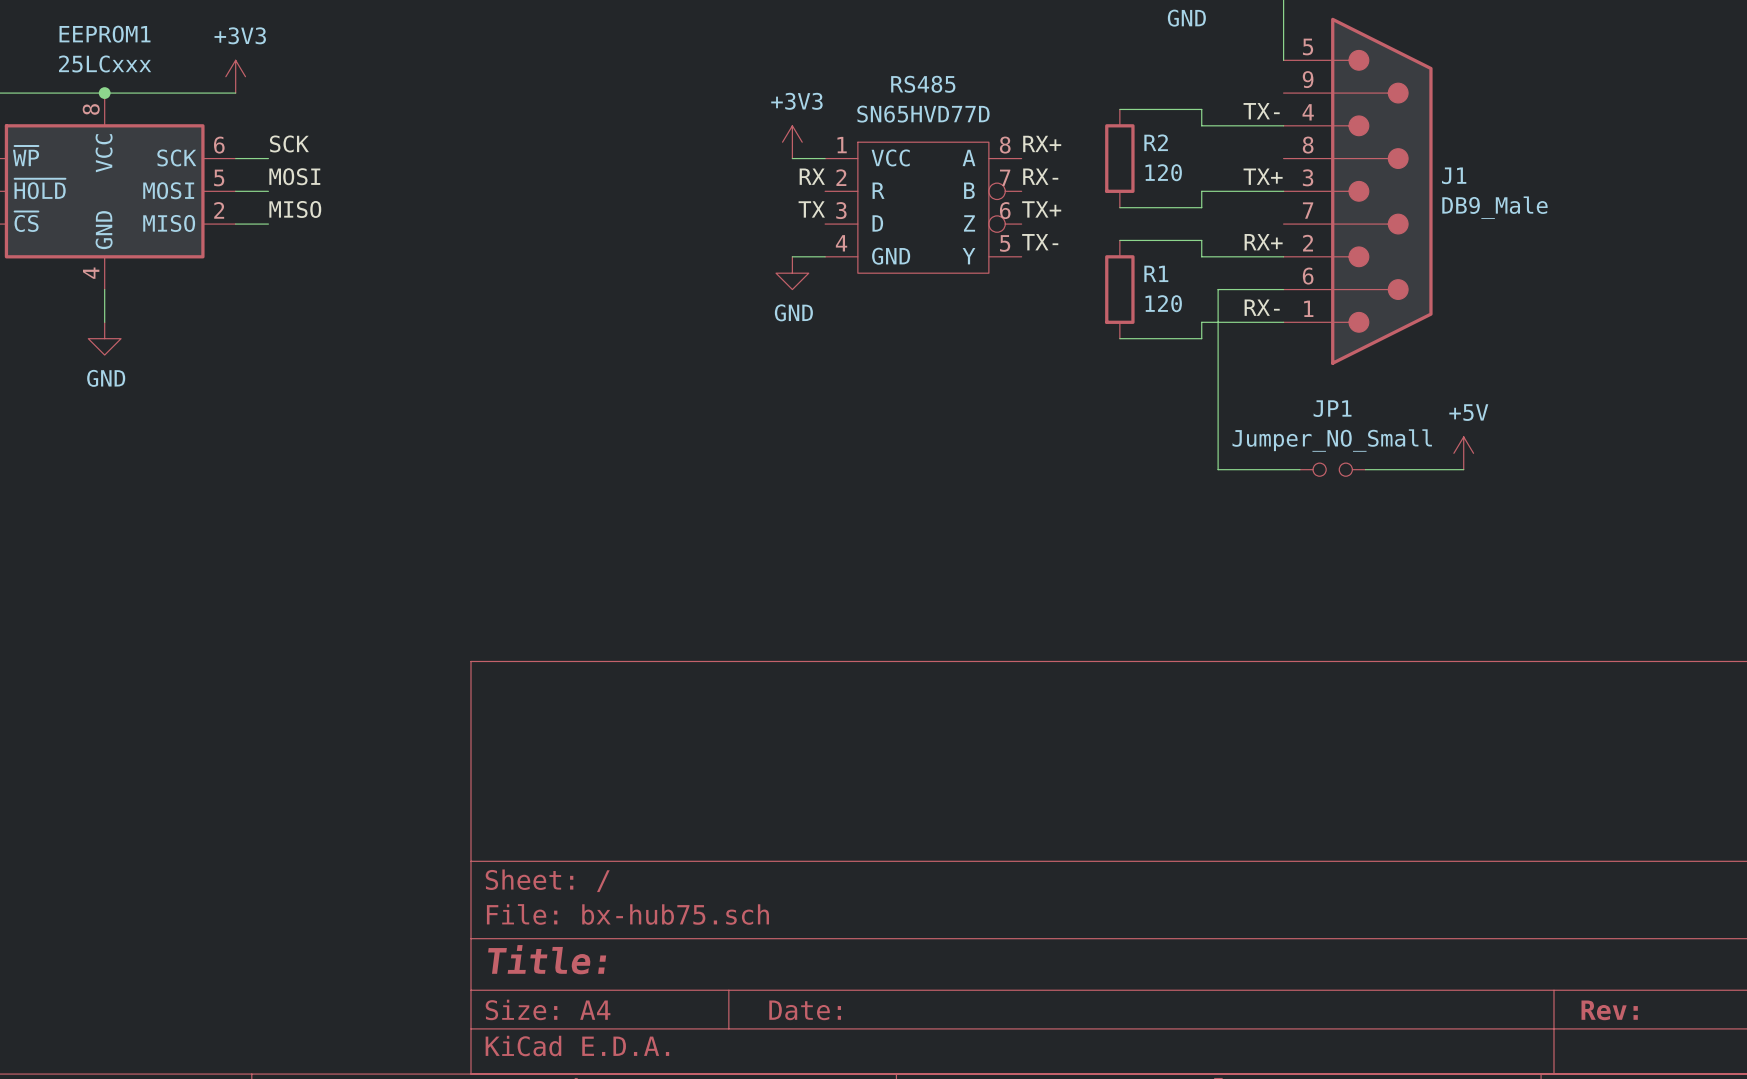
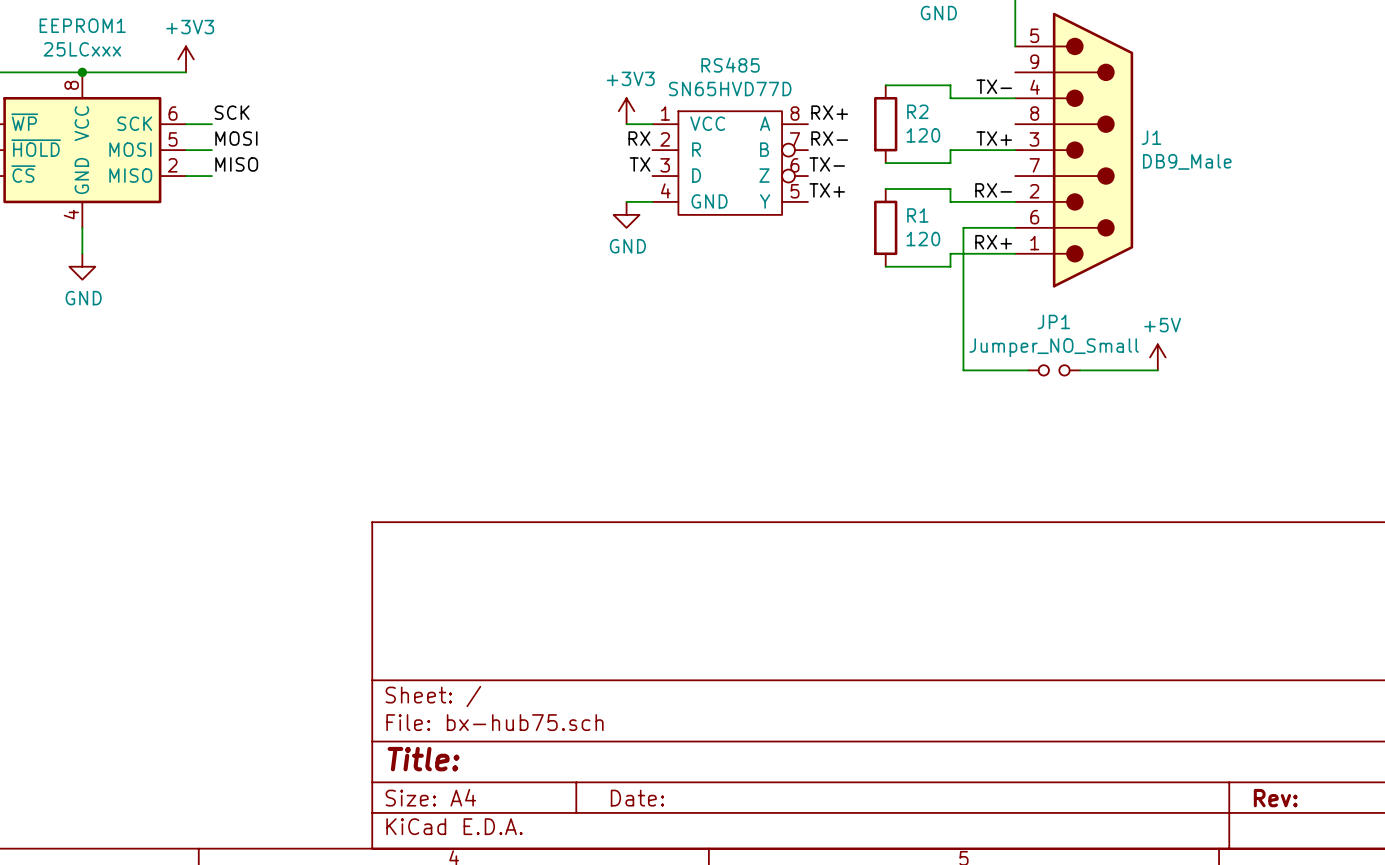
label: TX+ (1041, 209) -> TX- (827, 164)
label: TX- (1040, 242) -> TX+ (827, 190)
label: RX+ (1263, 242) -> RX- (993, 190)
label: RX- (1262, 307) -> RX+ (993, 242)

